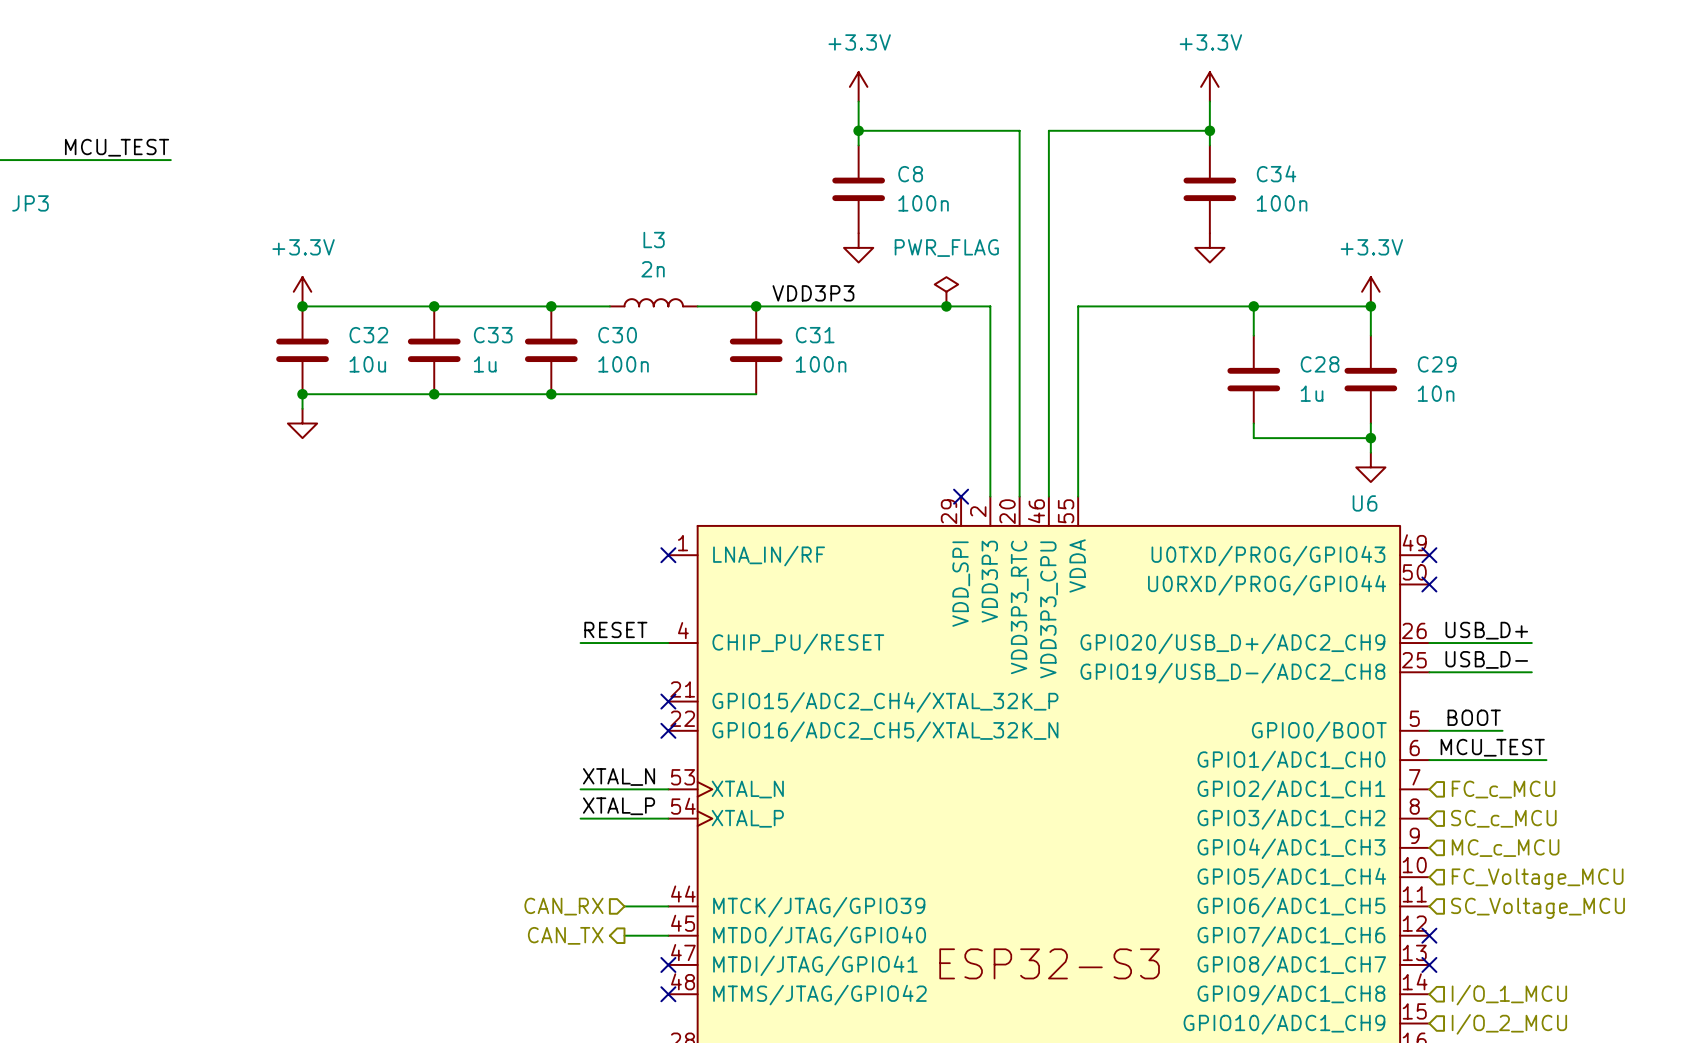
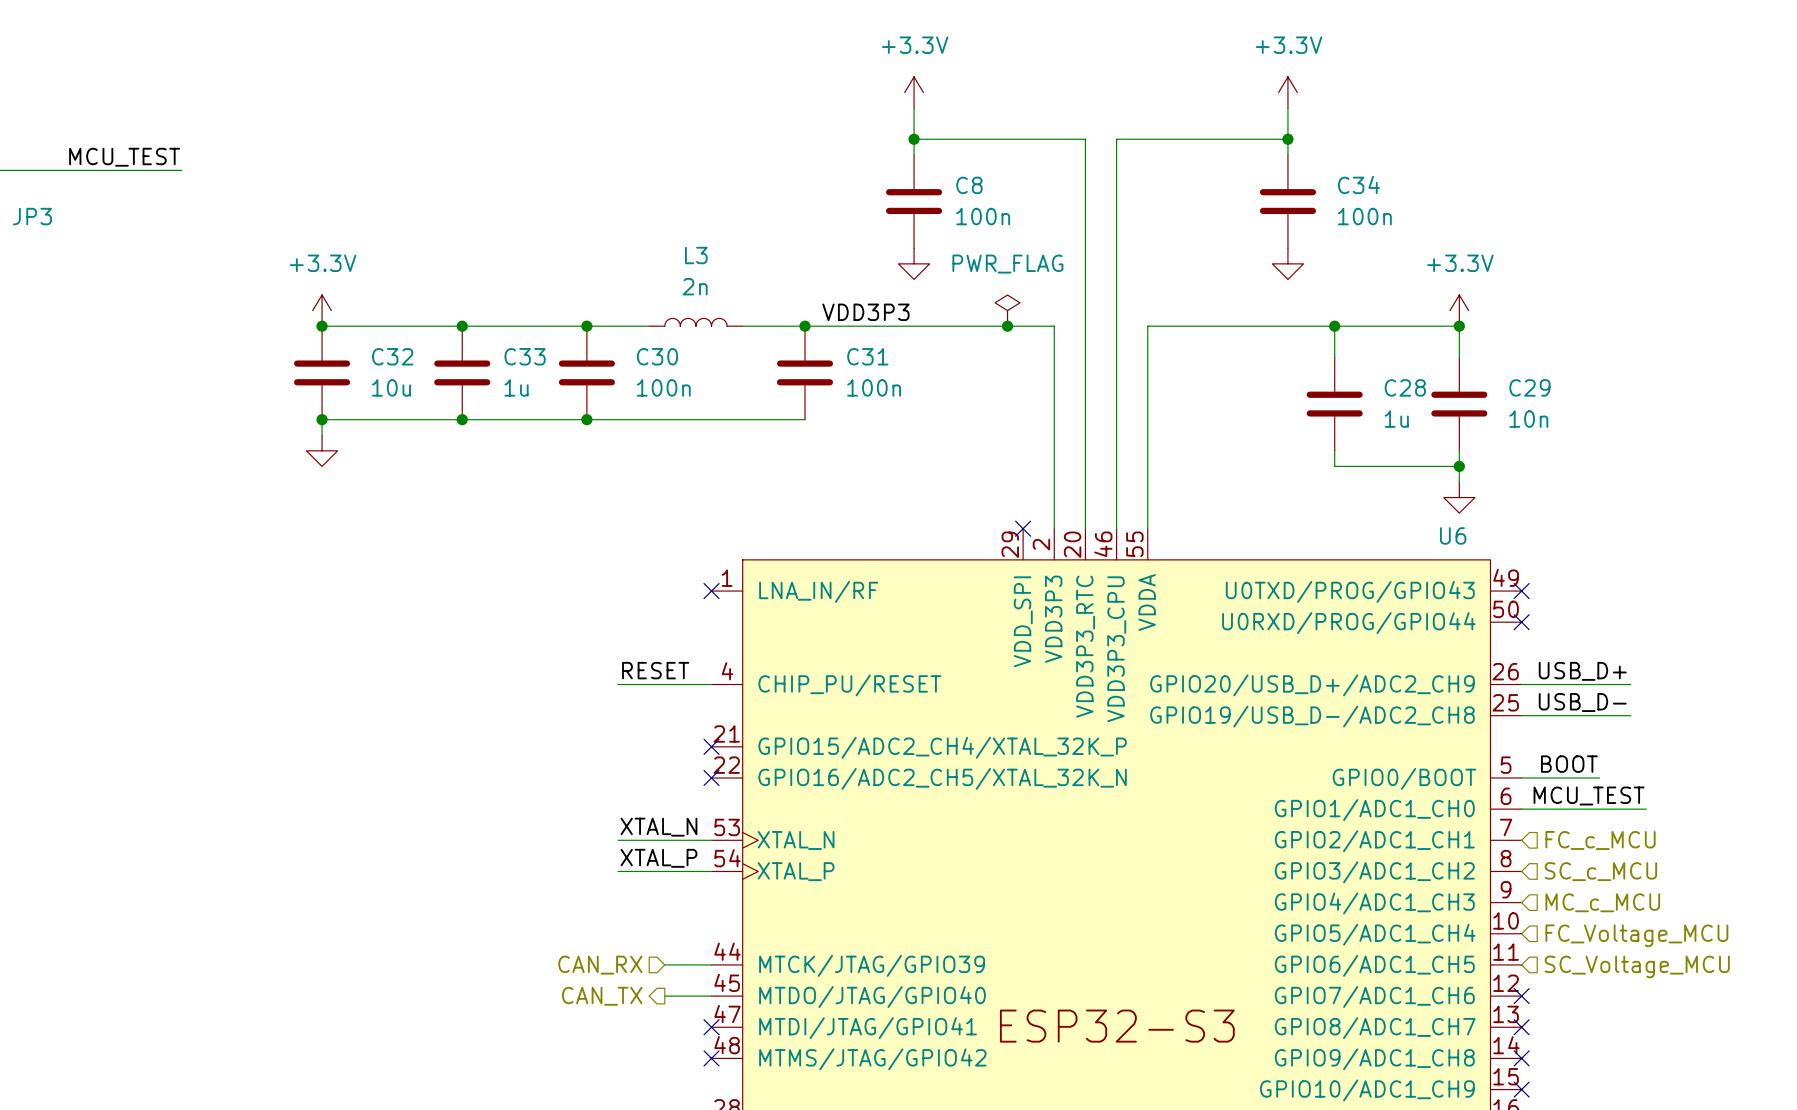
no-connect mark: none -> (1521, 1058)
hierarchical label: I/O_1_MCU (1509, 995) -> none
no-connect mark: none -> (1521, 1089)
hierarchical label: I/O_2_MCU (1509, 1024) -> none

